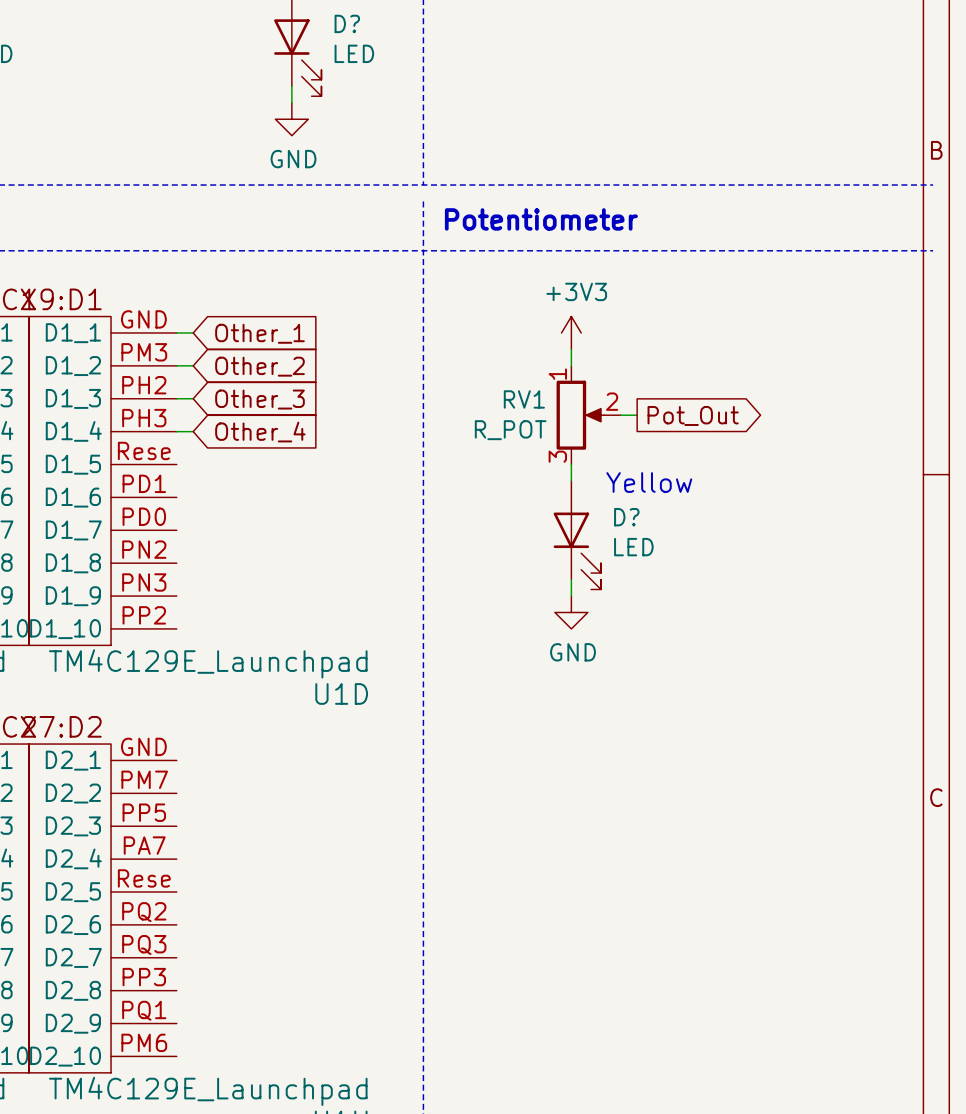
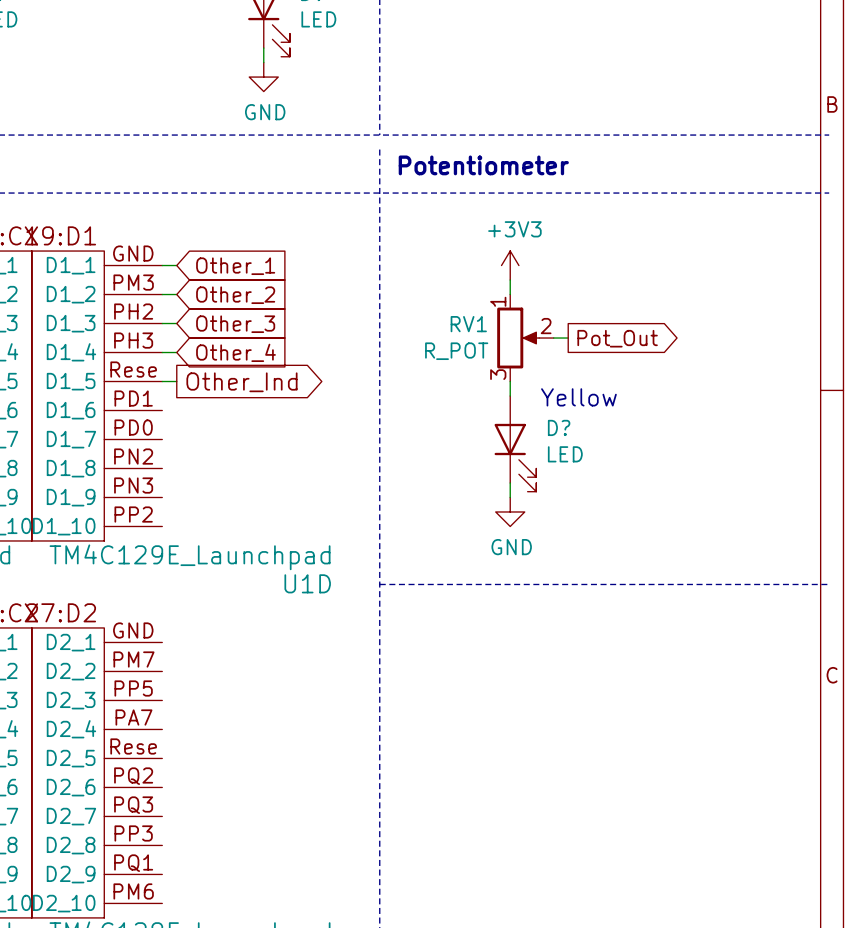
wire: none -> (162, 381) (176, 381)
global label: none -> Other_Ind (241, 382)
line: none -> (379, 584) (829, 584)

